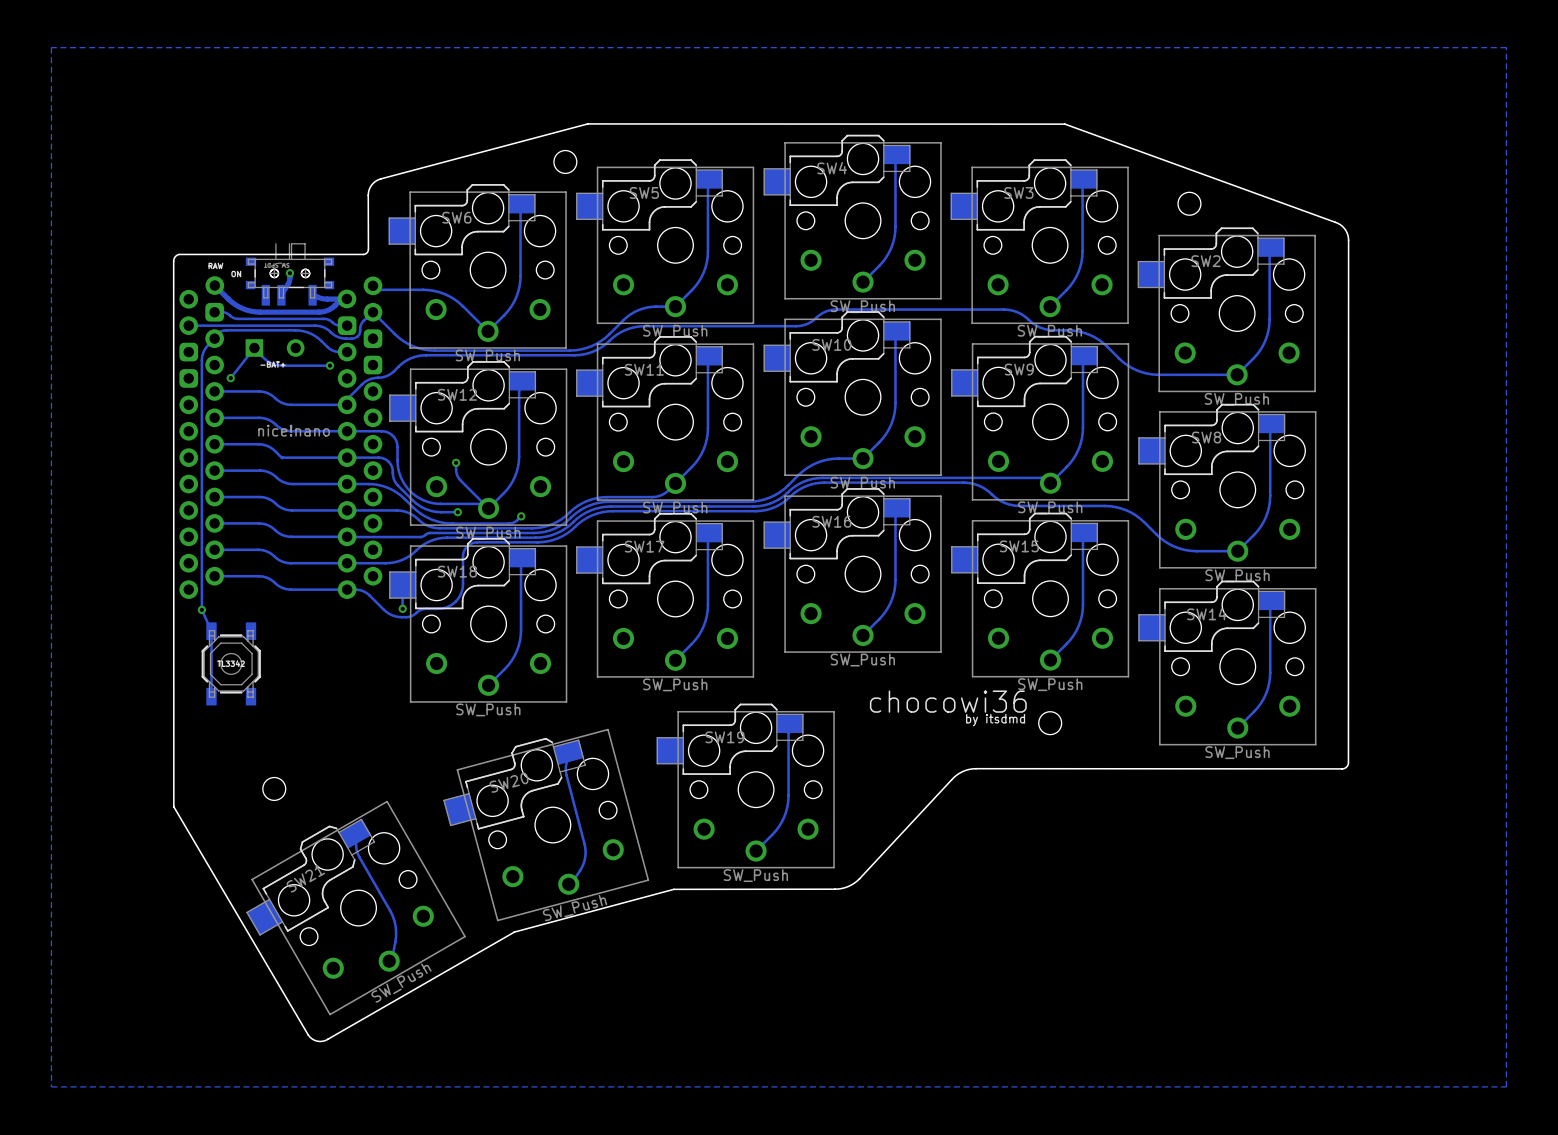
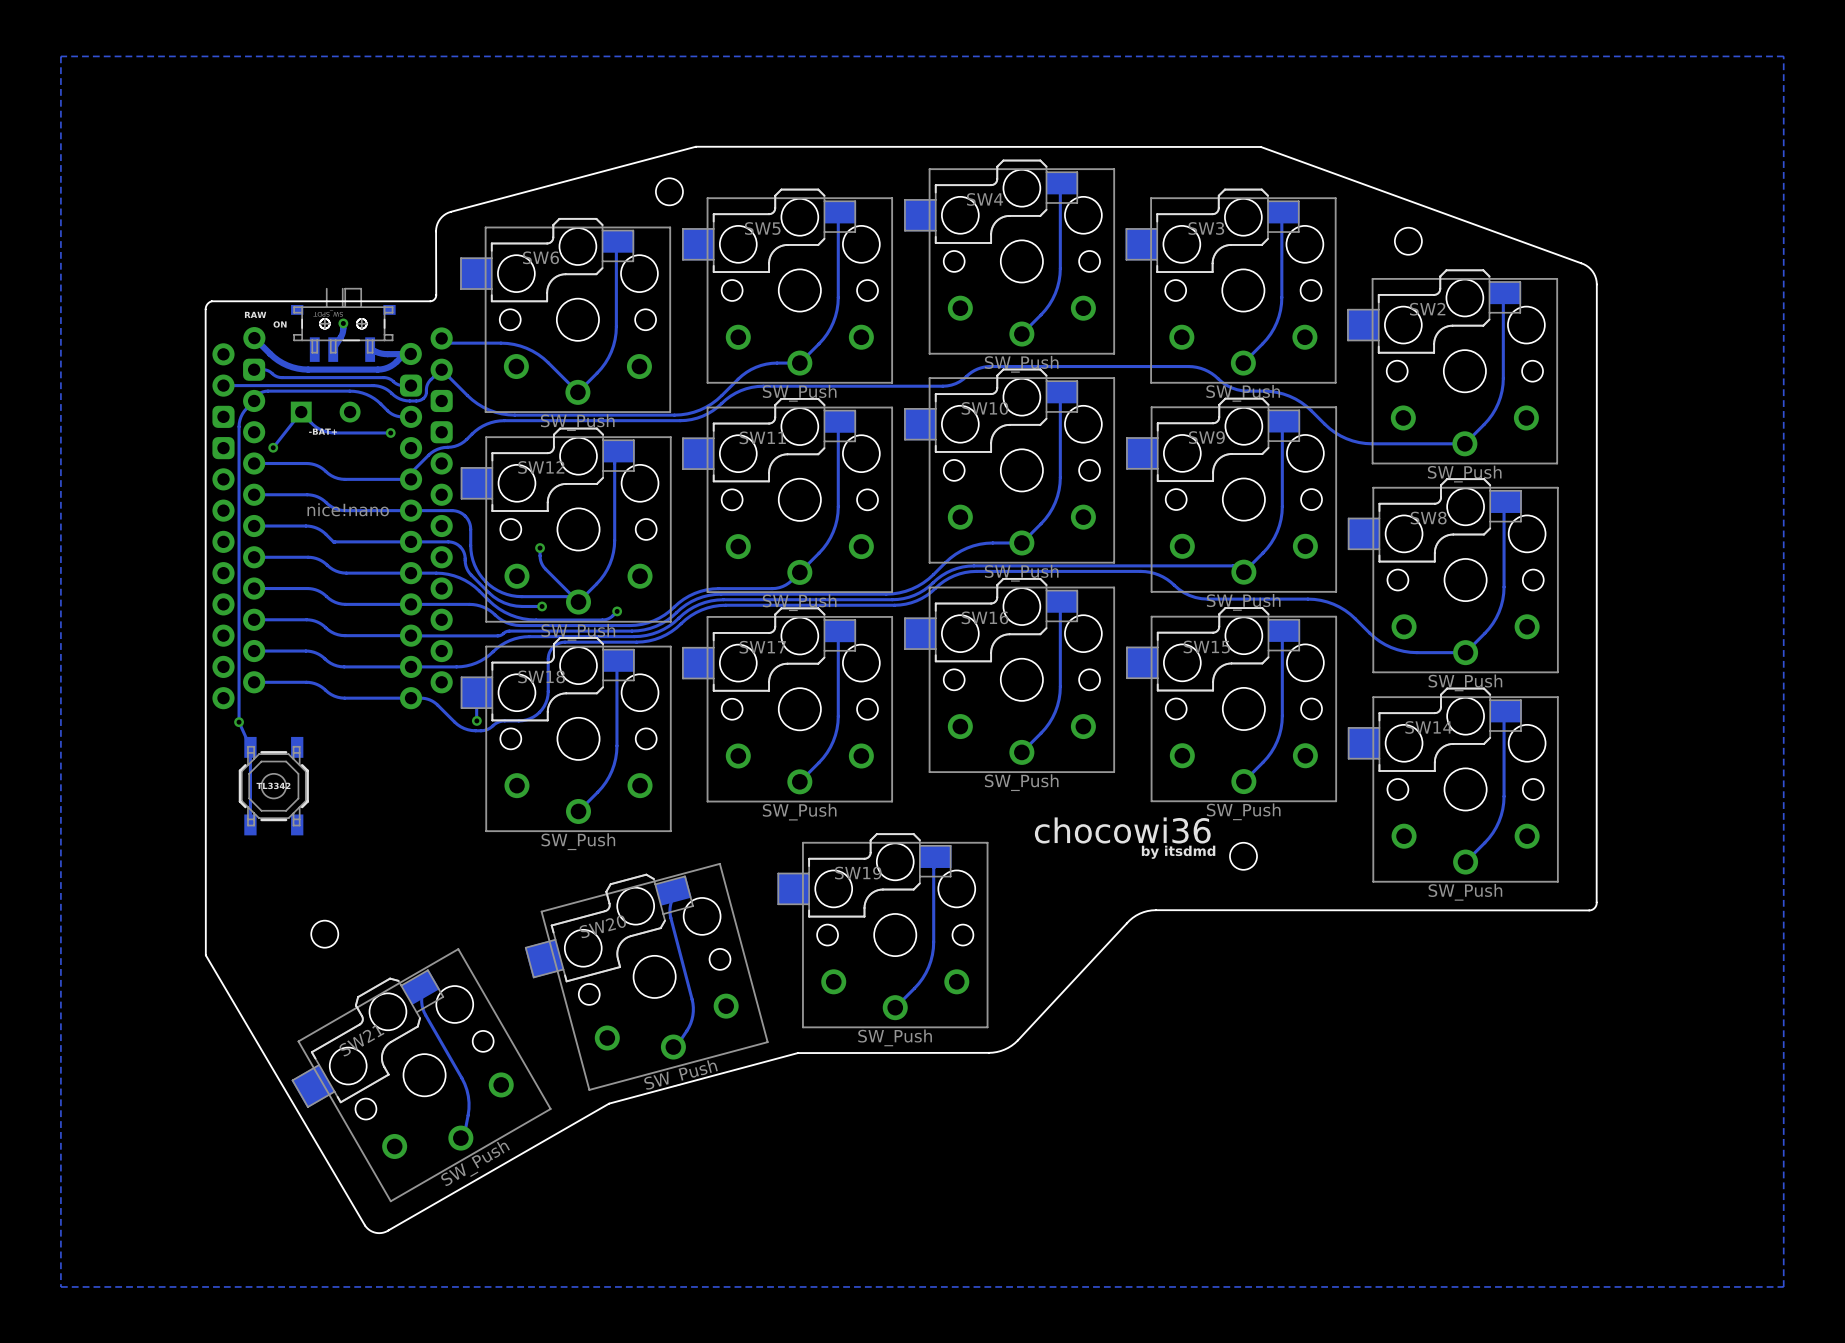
part footprint: [245, 243, 335, 306] -> [291, 288, 396, 362]

